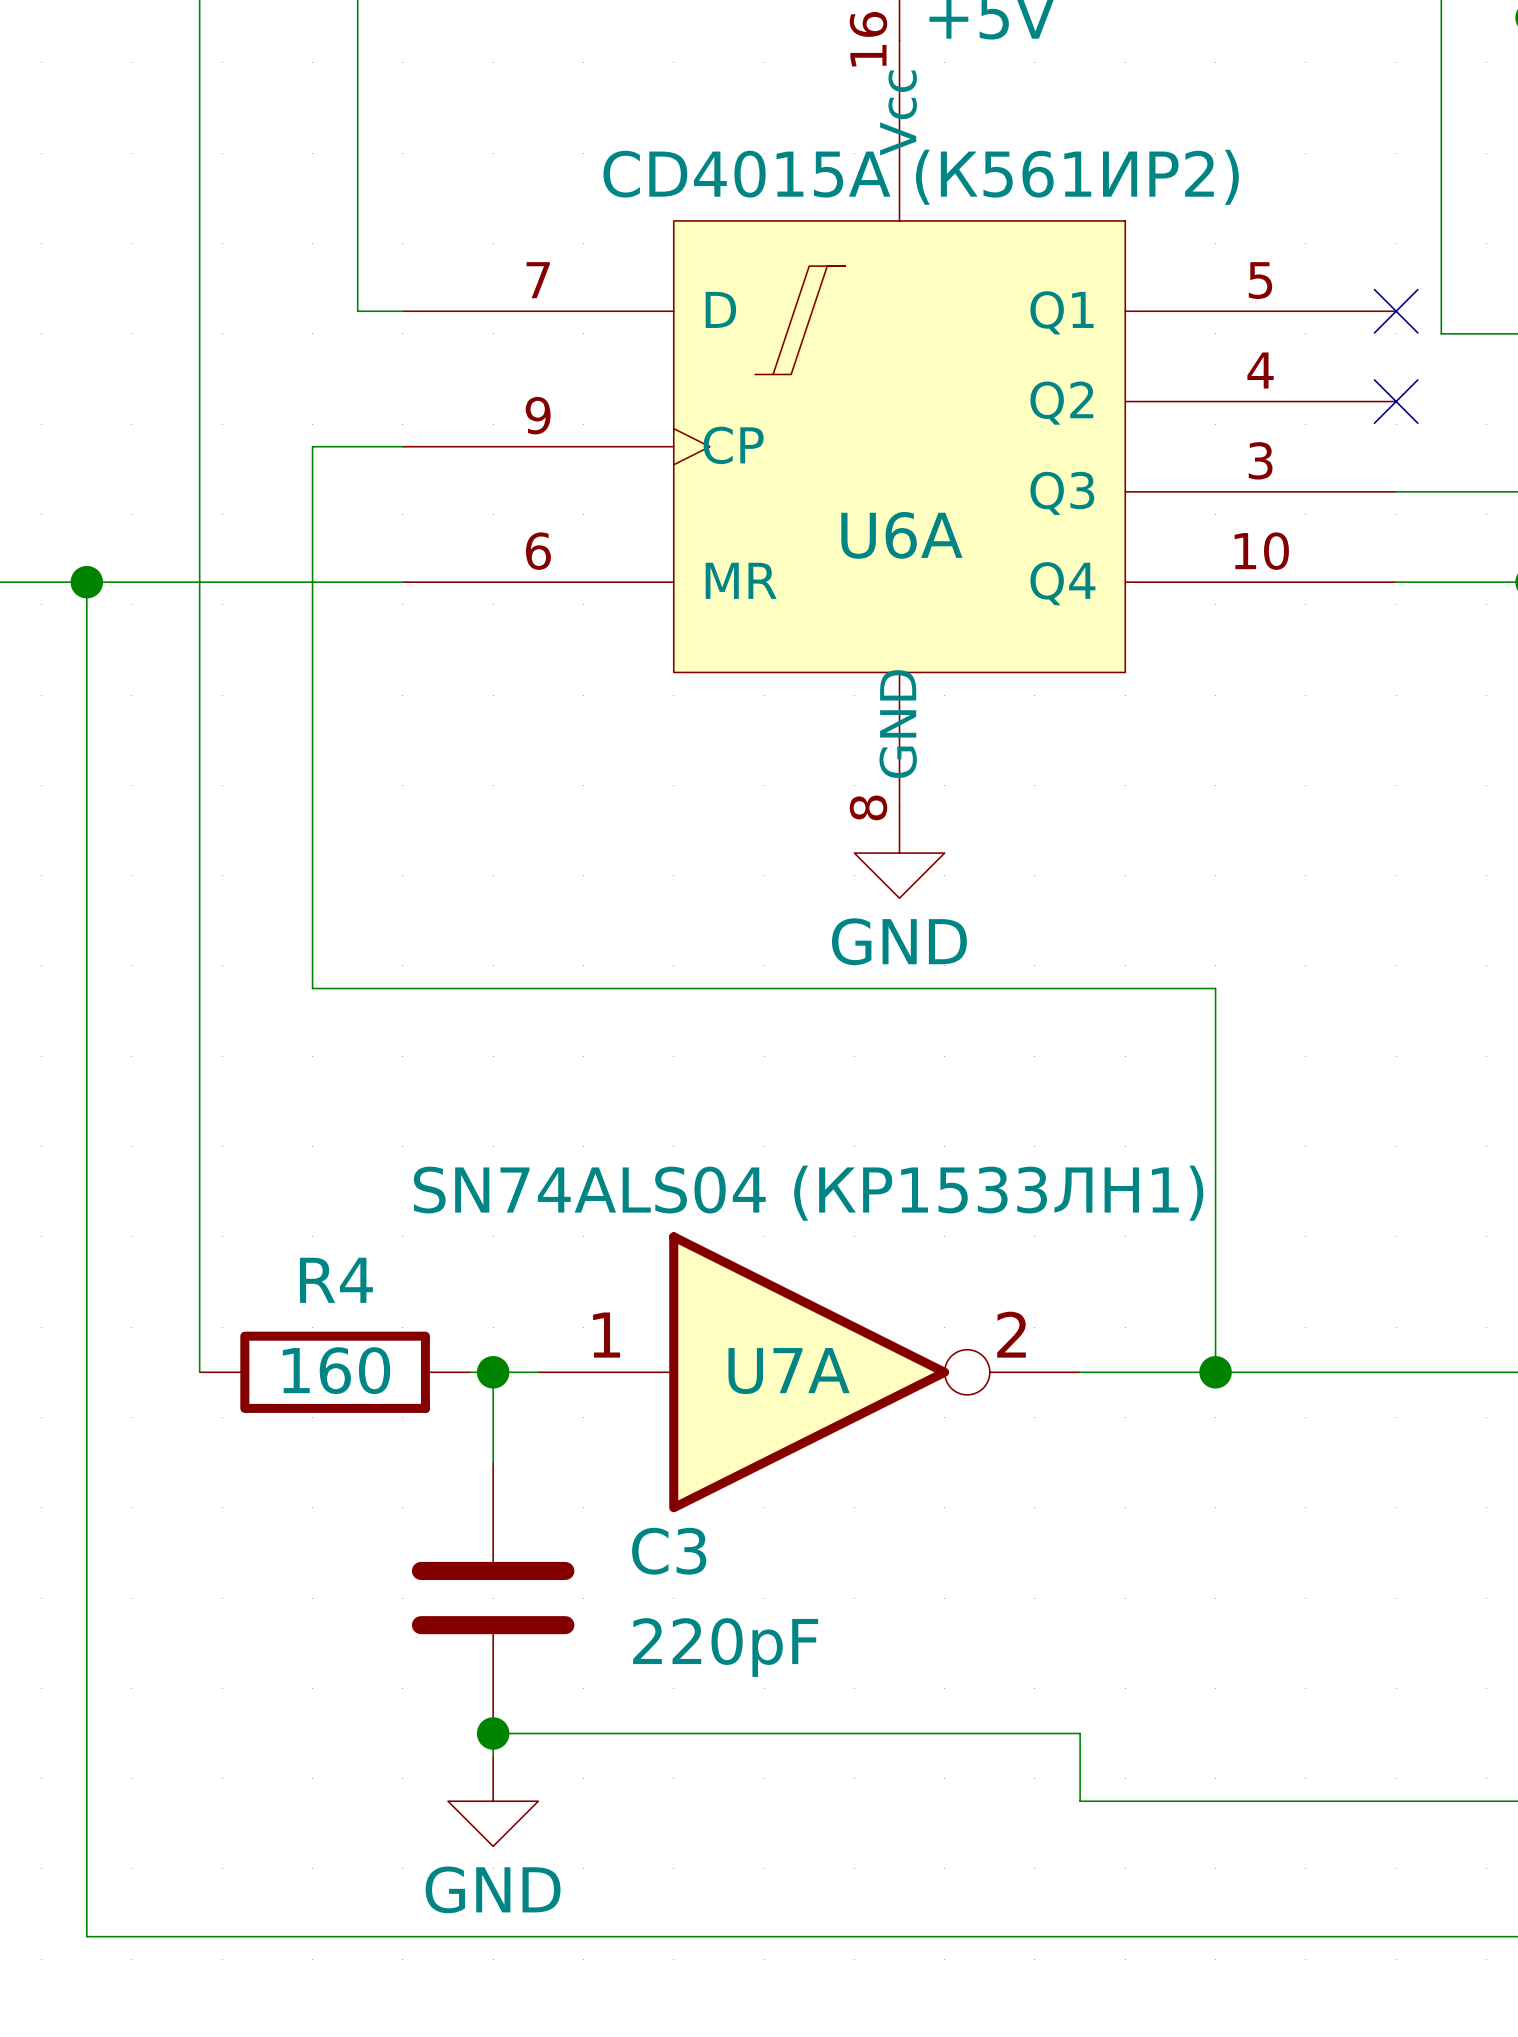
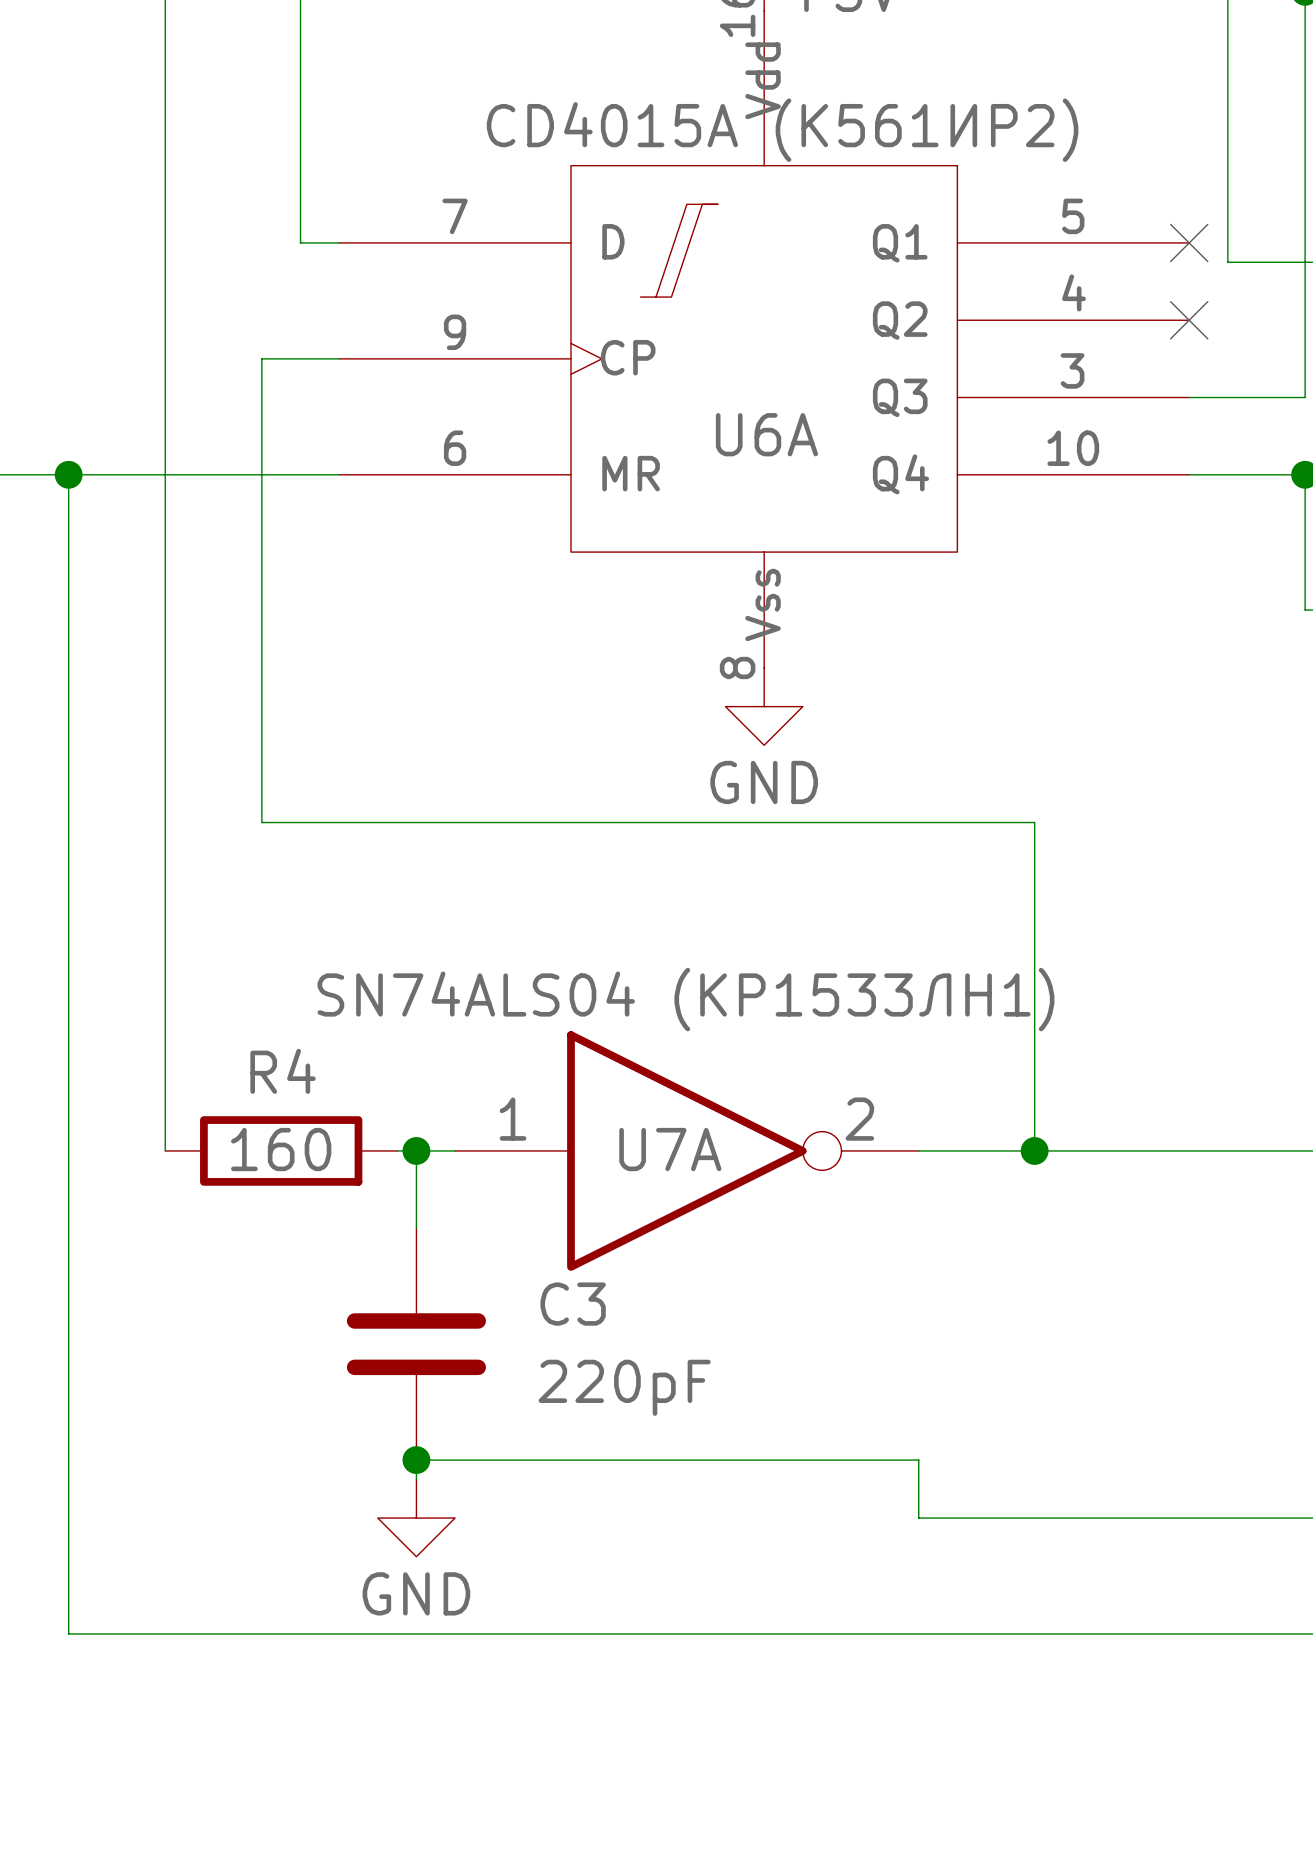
U6A pin name: Vcc (898, 112) -> Vdd (763, 80)
U6A pin name: GND (898, 724) -> Vss (763, 604)

